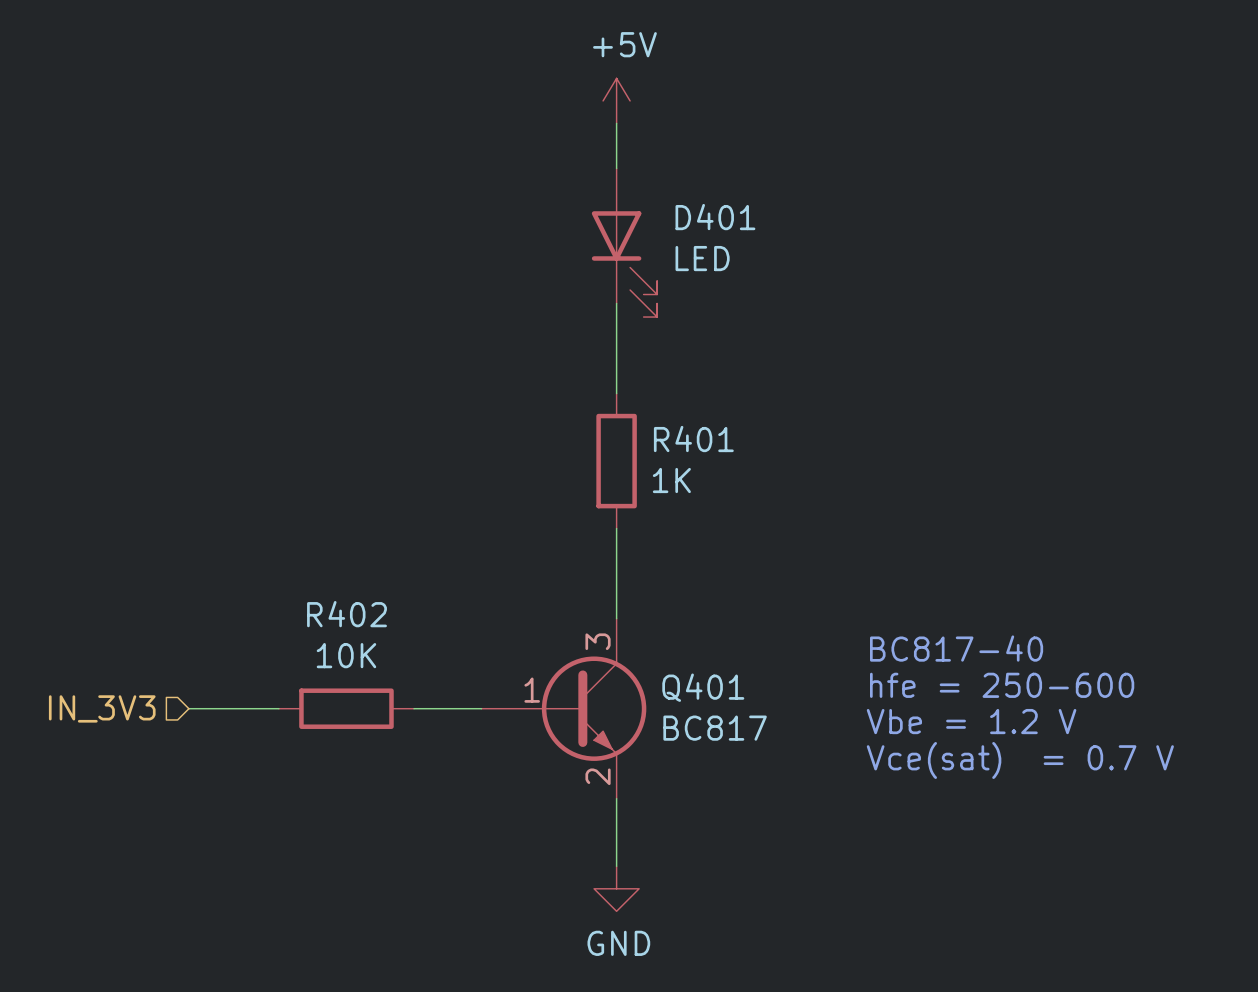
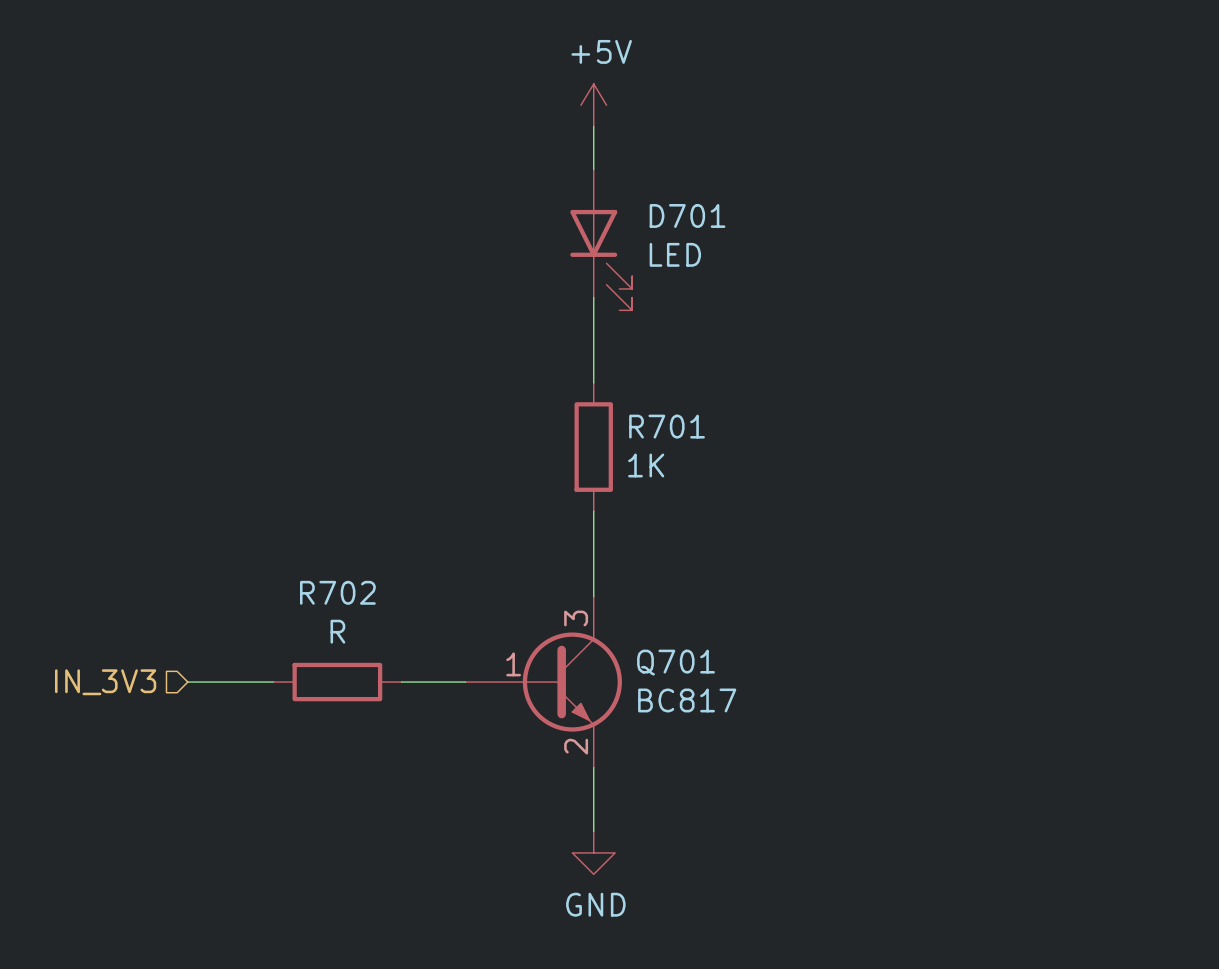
D401 name: D401 (715, 217) -> D701 (687, 215)
R401 name: R401 (693, 439) -> R701 (667, 426)
R402 name: R402 (347, 614) -> R702 (337, 592)
text: BC817-40 (956, 648) -> none
R402 value: 10K (346, 655) -> R (337, 631)
text: hfe = 250-600 (1002, 685) -> none
Q401 name: Q401 (703, 687) -> Q701 (676, 662)
text: Vbe = 1.2 V (971, 721) -> none
text: Vce(sat) = 0.7 V (1020, 760) -> none

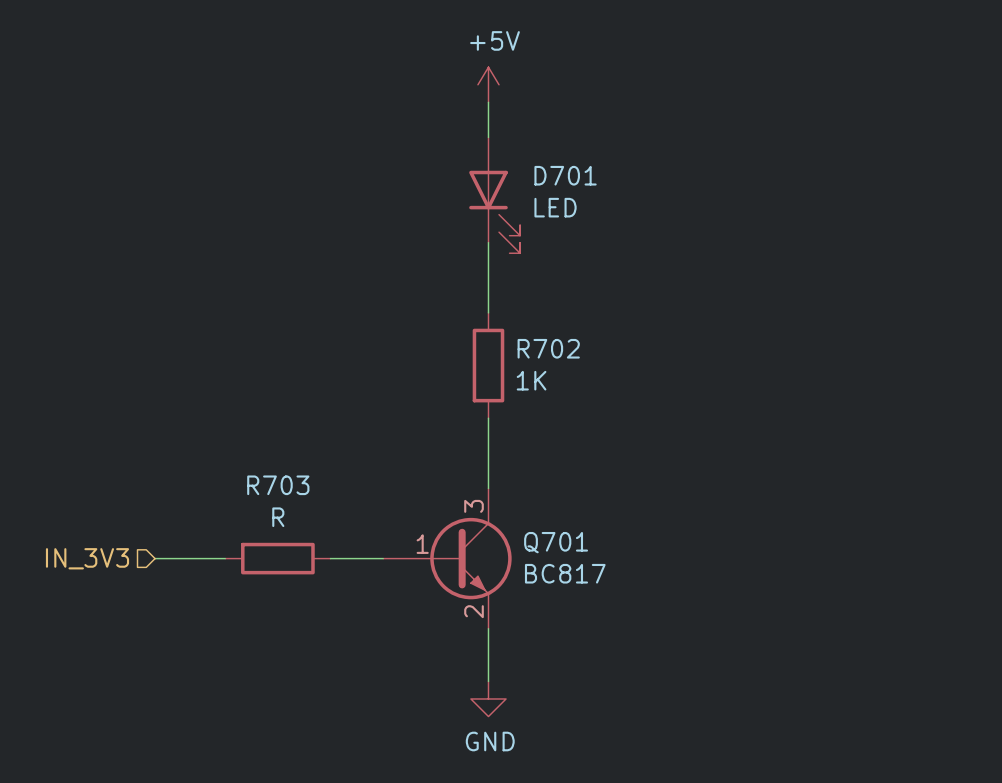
R701 name: R701 (667, 426) -> R702 (548, 348)
R702 name: R702 (337, 592) -> R703 (278, 485)

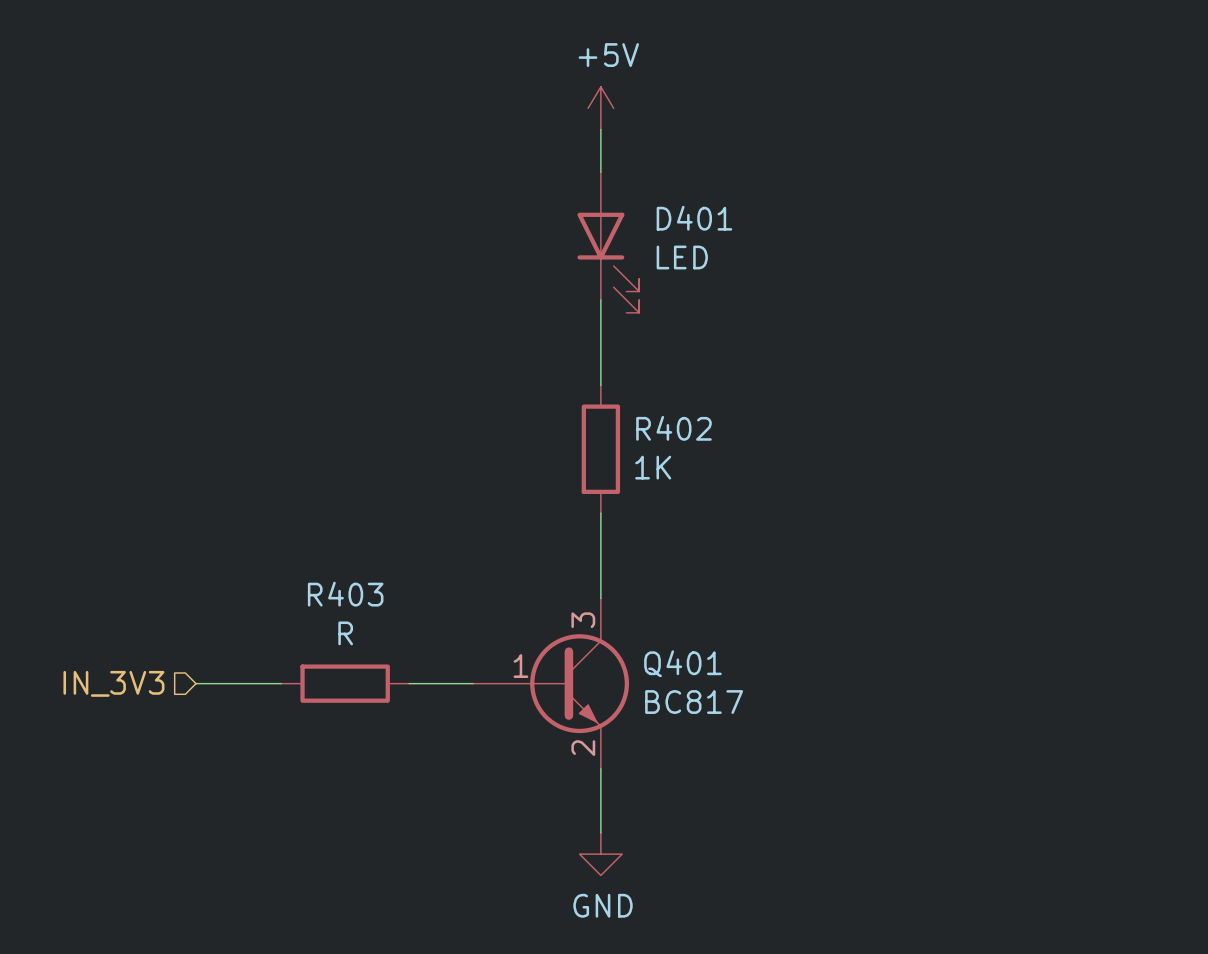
D701 name: D701 (565, 175) -> D401 (694, 218)
R702 name: R702 (548, 348) -> R402 (674, 428)
R703 name: R703 (278, 485) -> R403 (345, 594)
Q701 name: Q701 (556, 542) -> Q401 (682, 663)

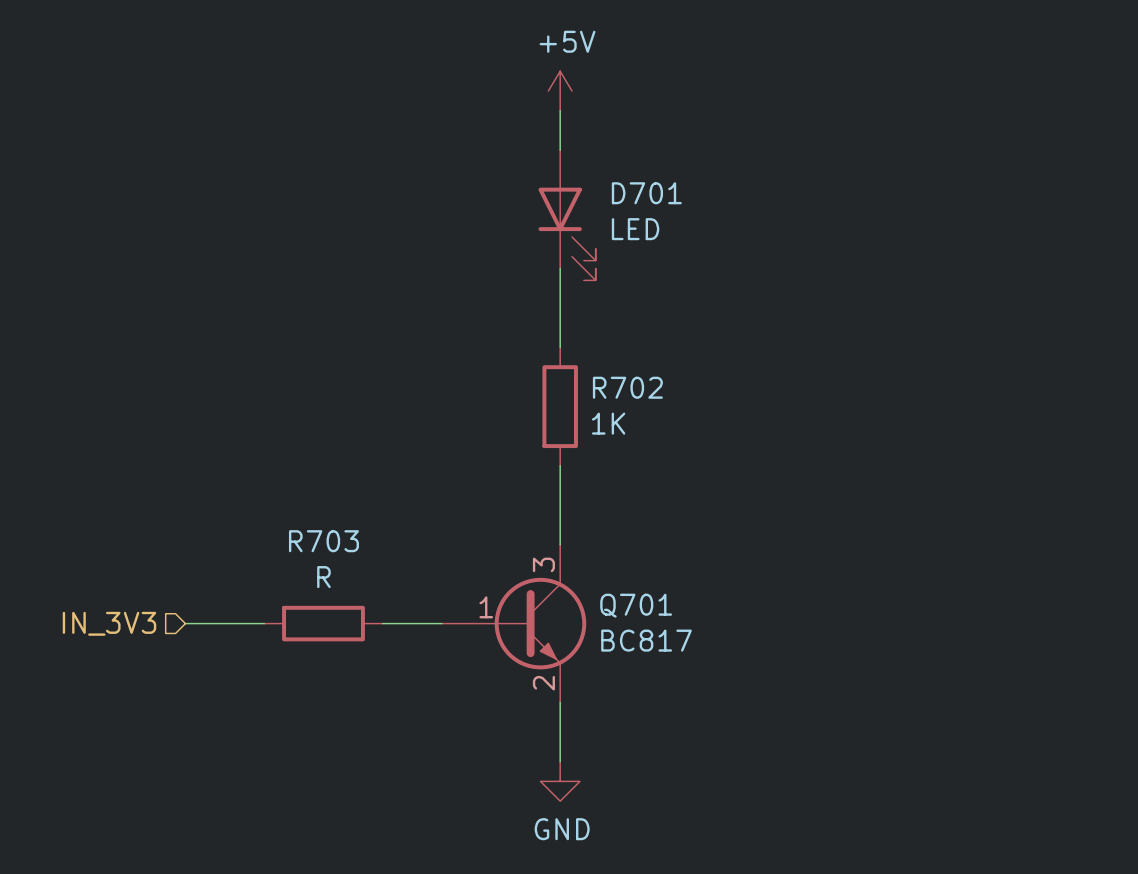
D401 name: D401 (694, 218) -> D701 (646, 193)
R402 name: R402 (674, 428) -> R702 (627, 387)
R403 name: R403 (345, 594) -> R703 (323, 541)
Q401 name: Q401 (682, 663) -> Q701 (636, 605)

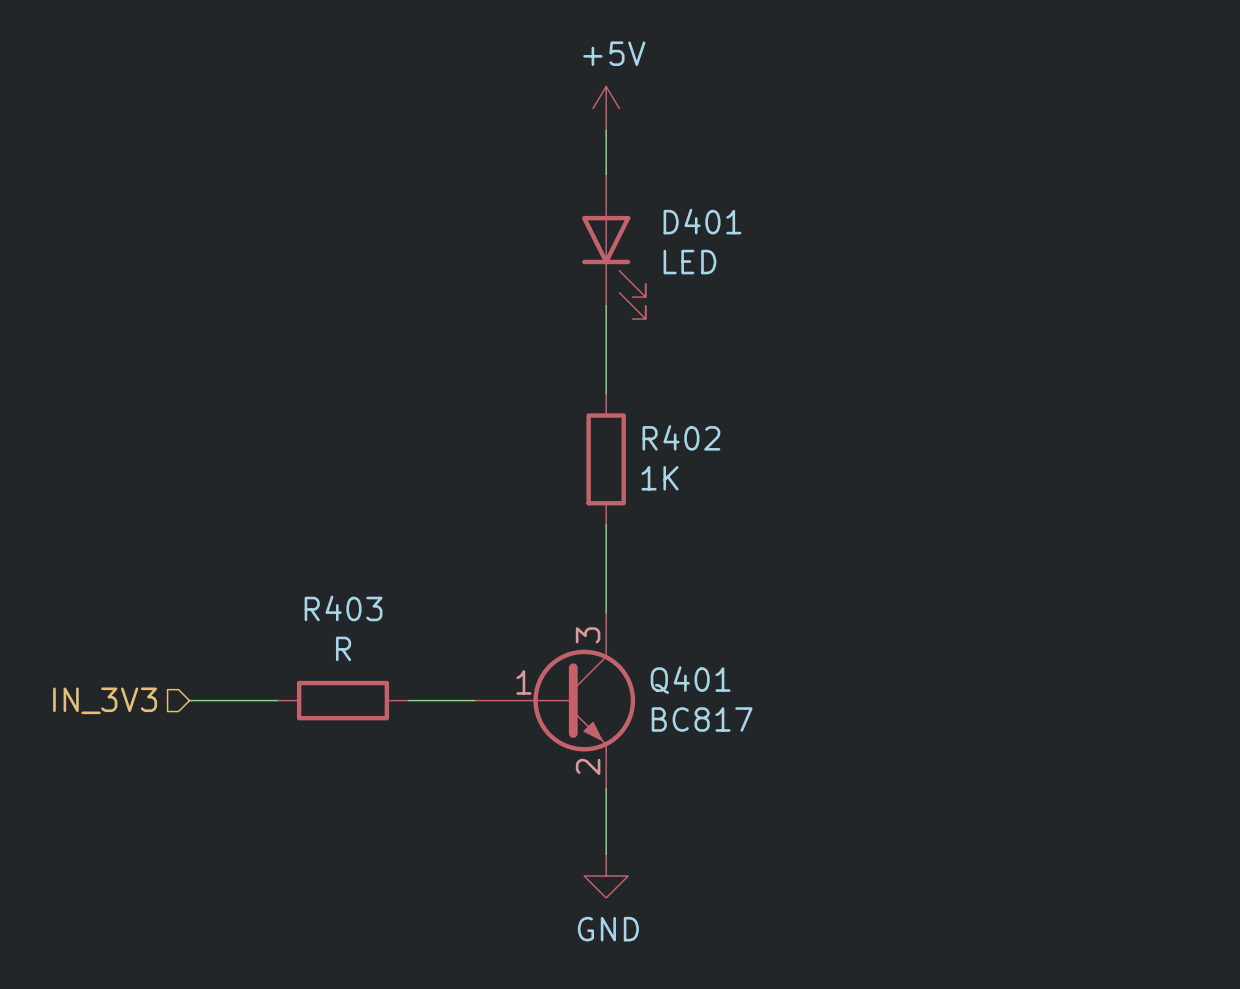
D701 name: D701 (646, 193) -> D401 (702, 221)
R702 name: R702 (627, 387) -> R402 (681, 437)
R703 name: R703 (323, 541) -> R403 (343, 608)
Q701 name: Q701 (636, 605) -> Q401 (690, 680)

